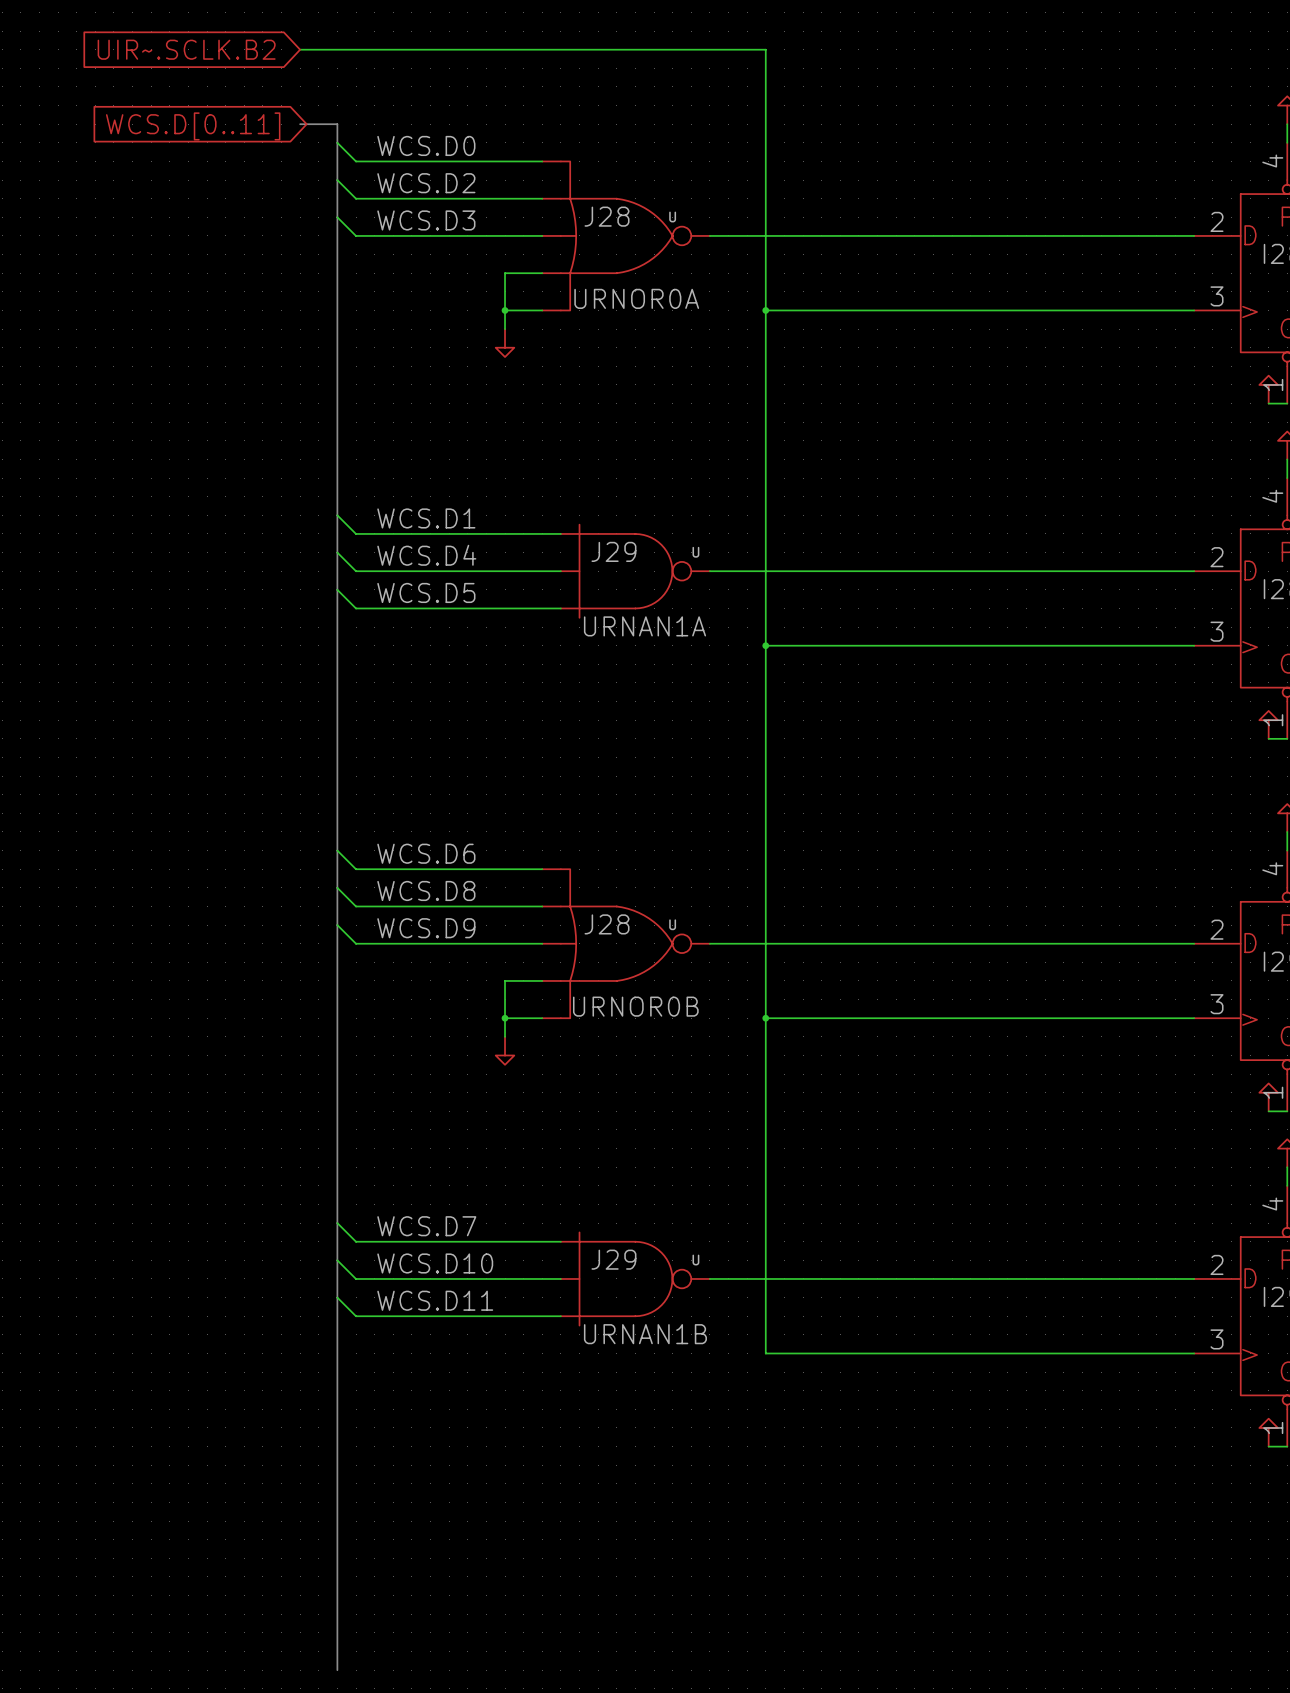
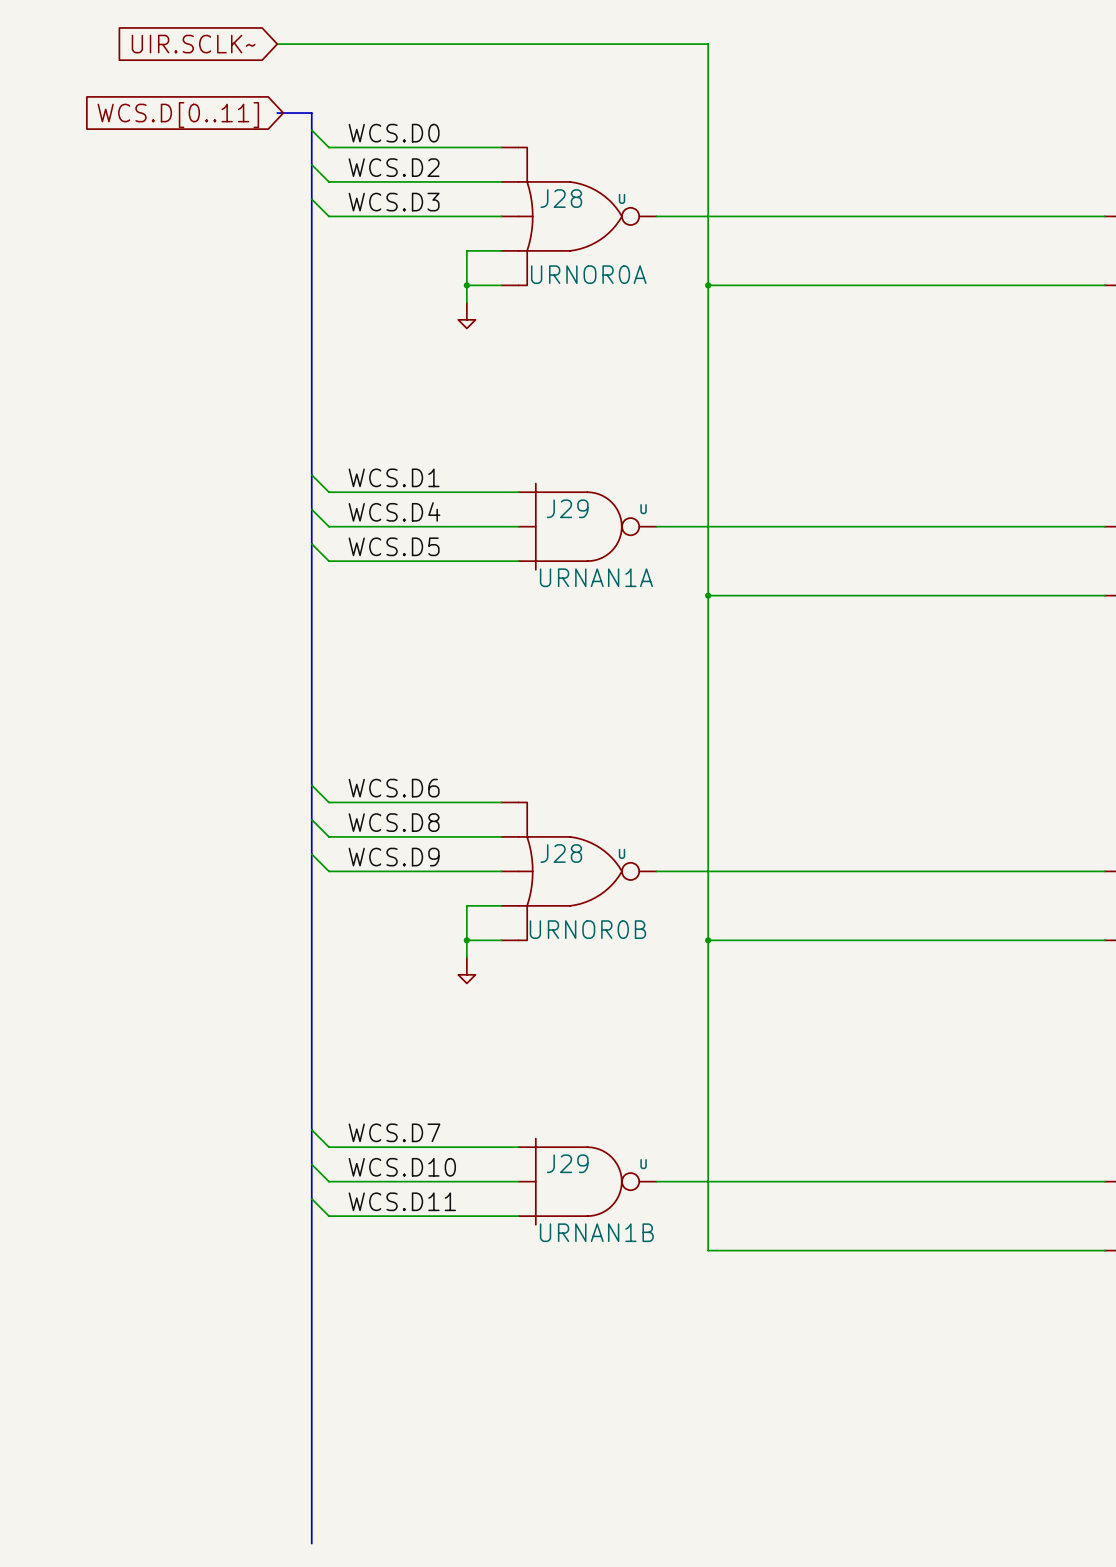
global label: UIR~.SCLK.B2 (186, 49) -> UIR.SCLK~ (193, 44)

